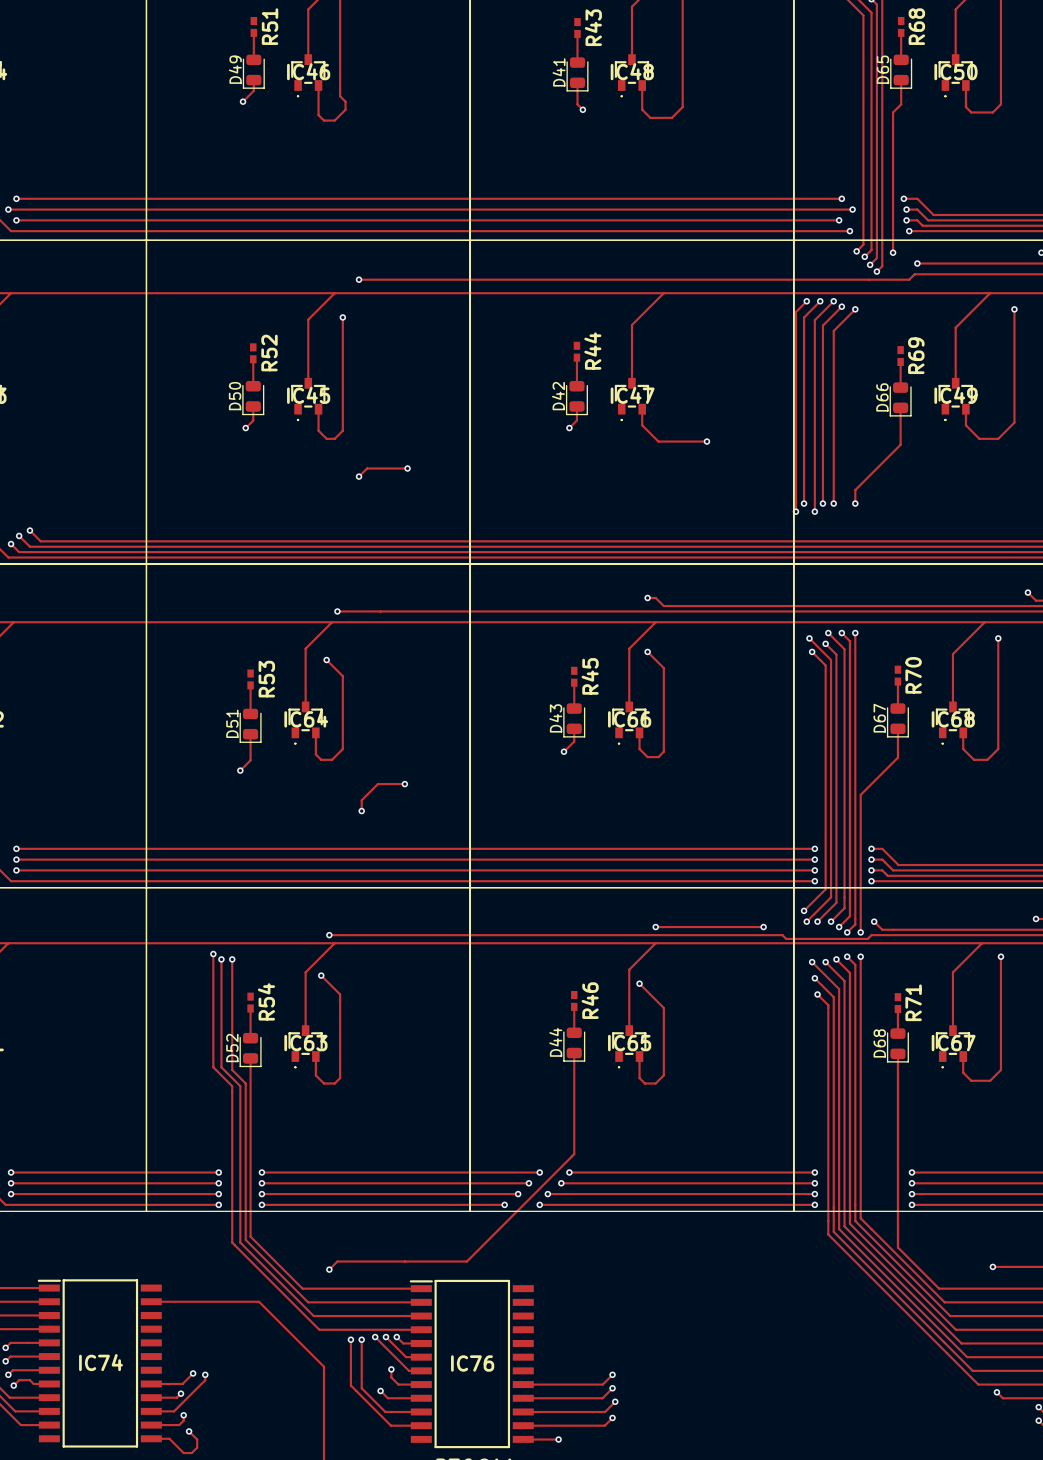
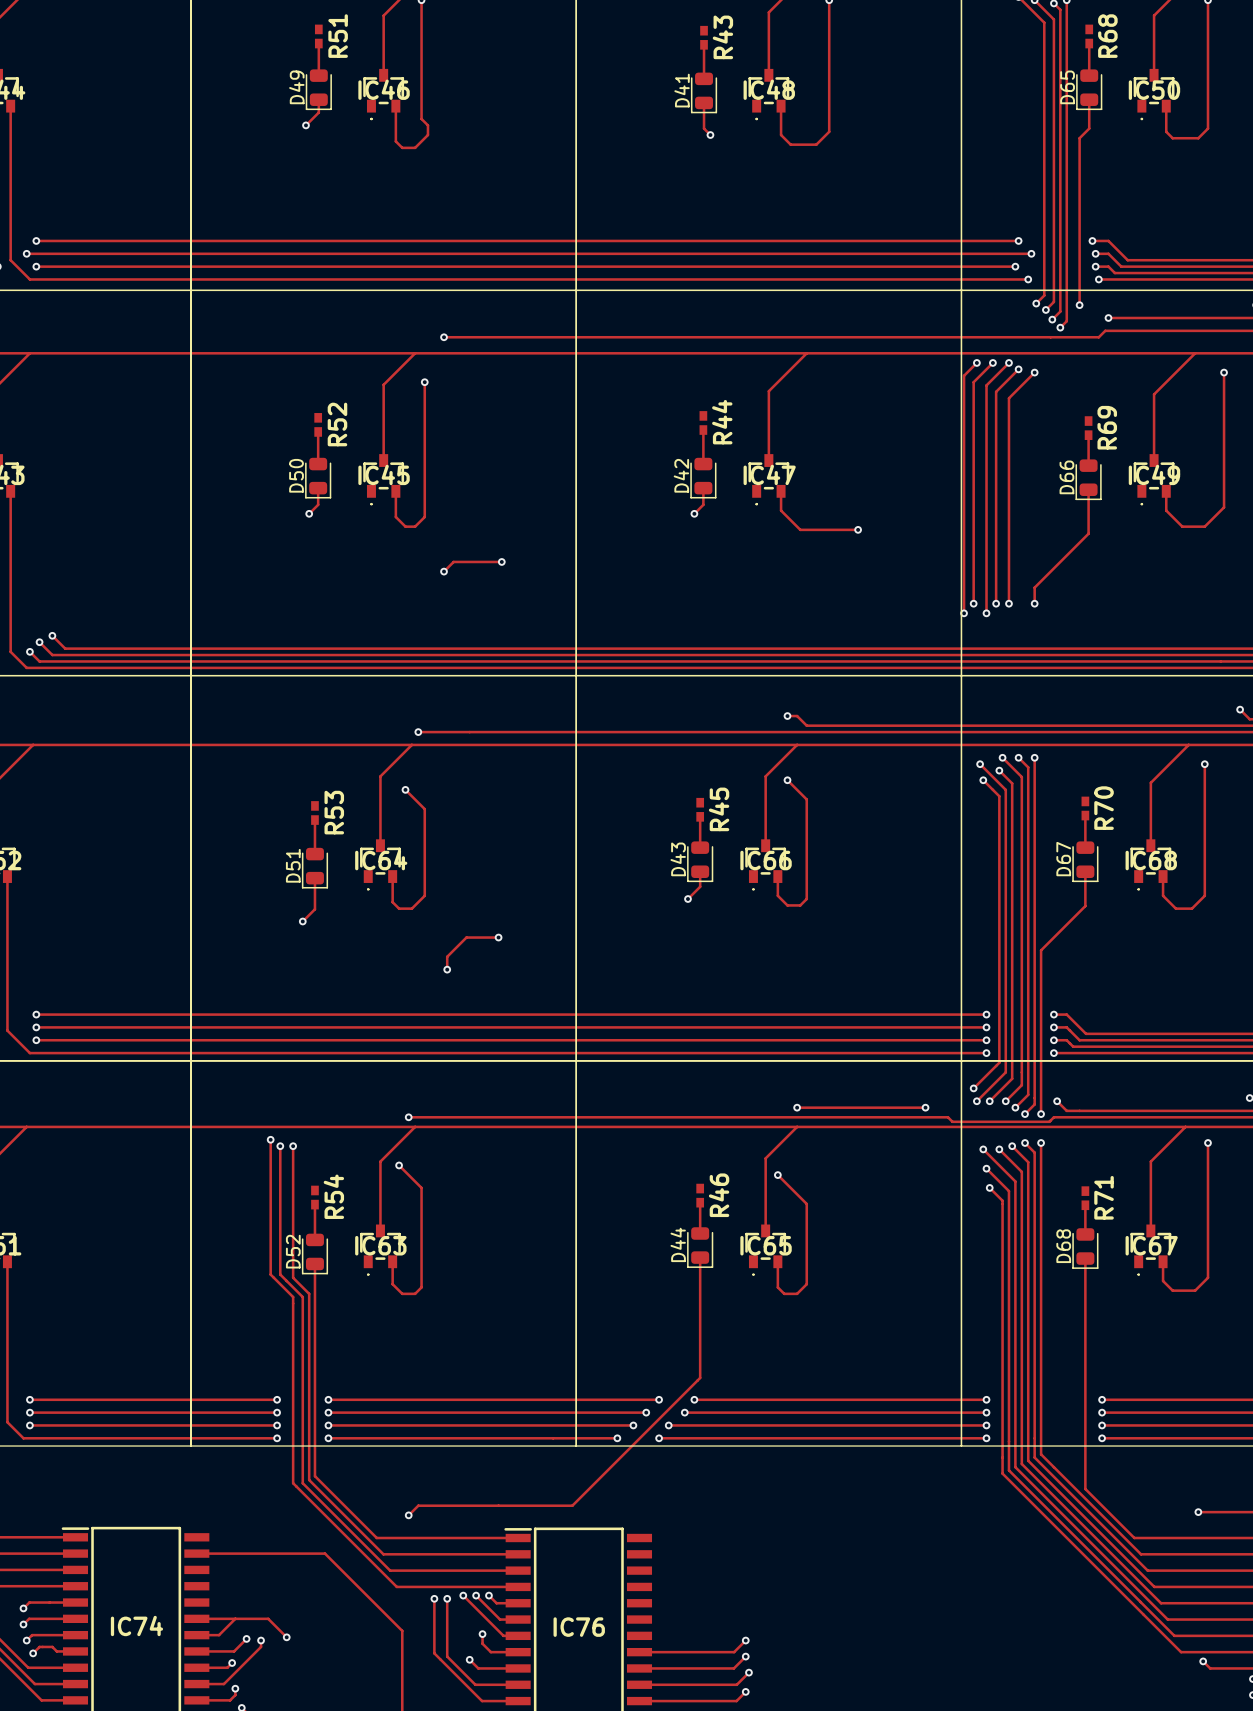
track: none -> (196, 1618) (268, 1618) (286, 1637)
track: none -> (235, 1618) (219, 1635) (196, 1635)
via: none -> (286, 1637)

